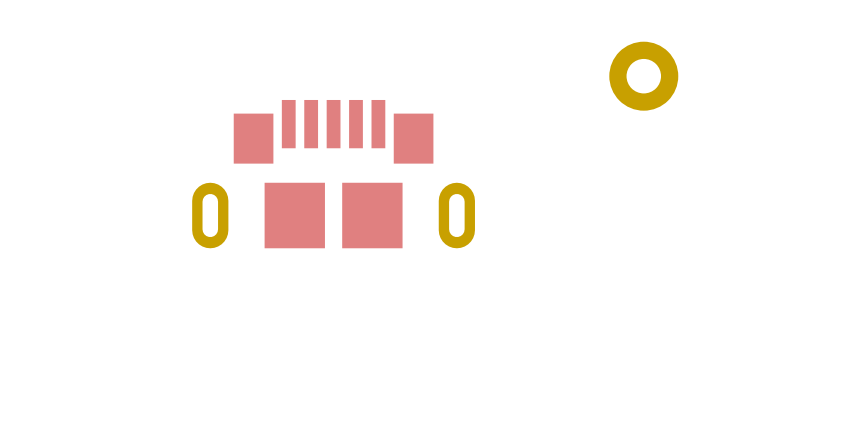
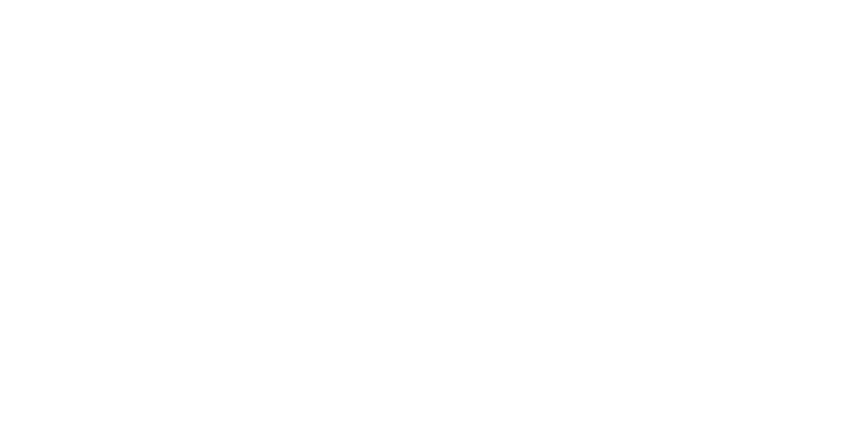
part: (643, 76) -> none
part: (333, 174) -> none

